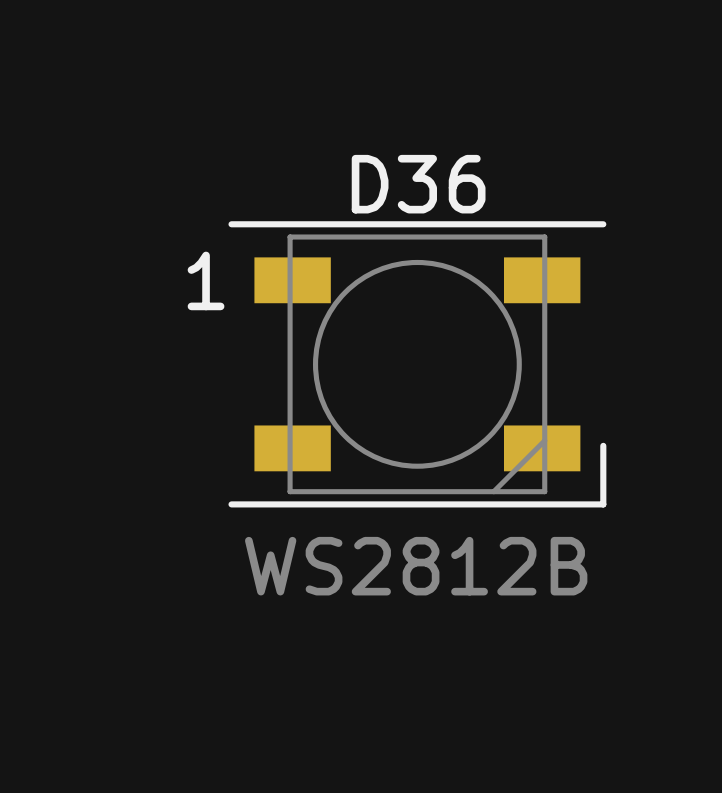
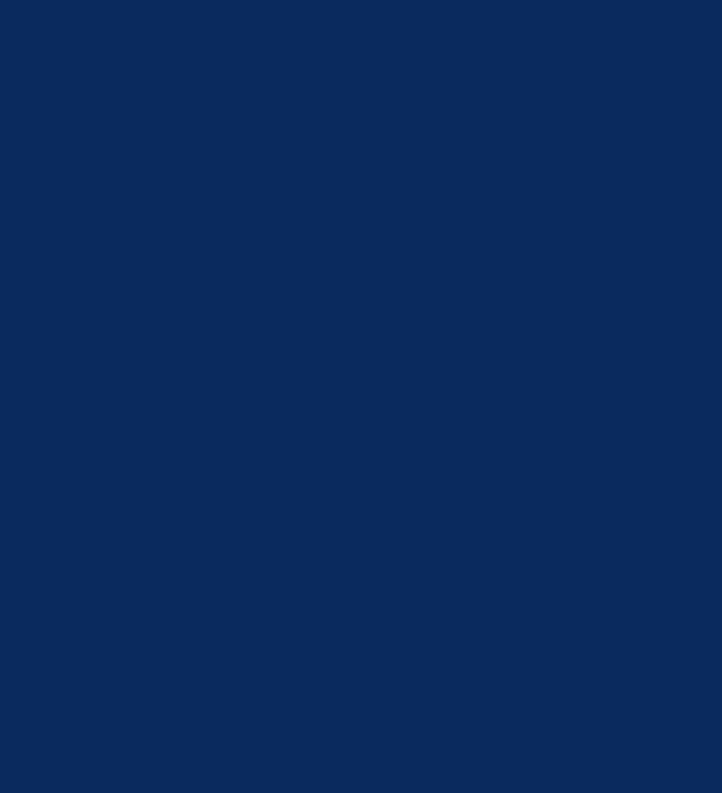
D36: WS2812B (417, 364) -> none

